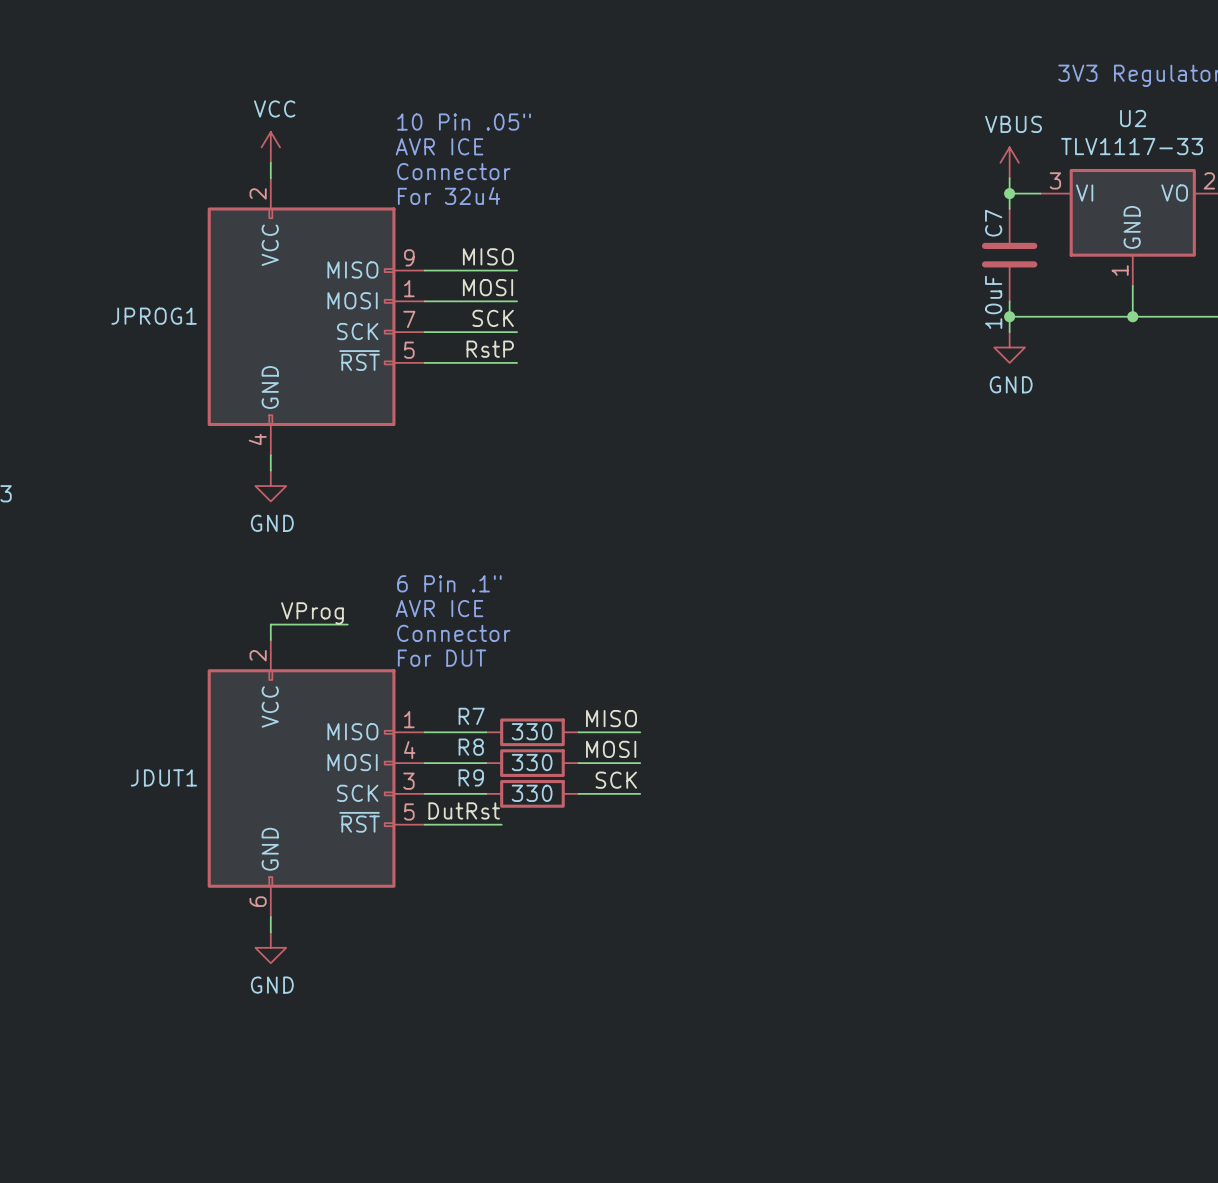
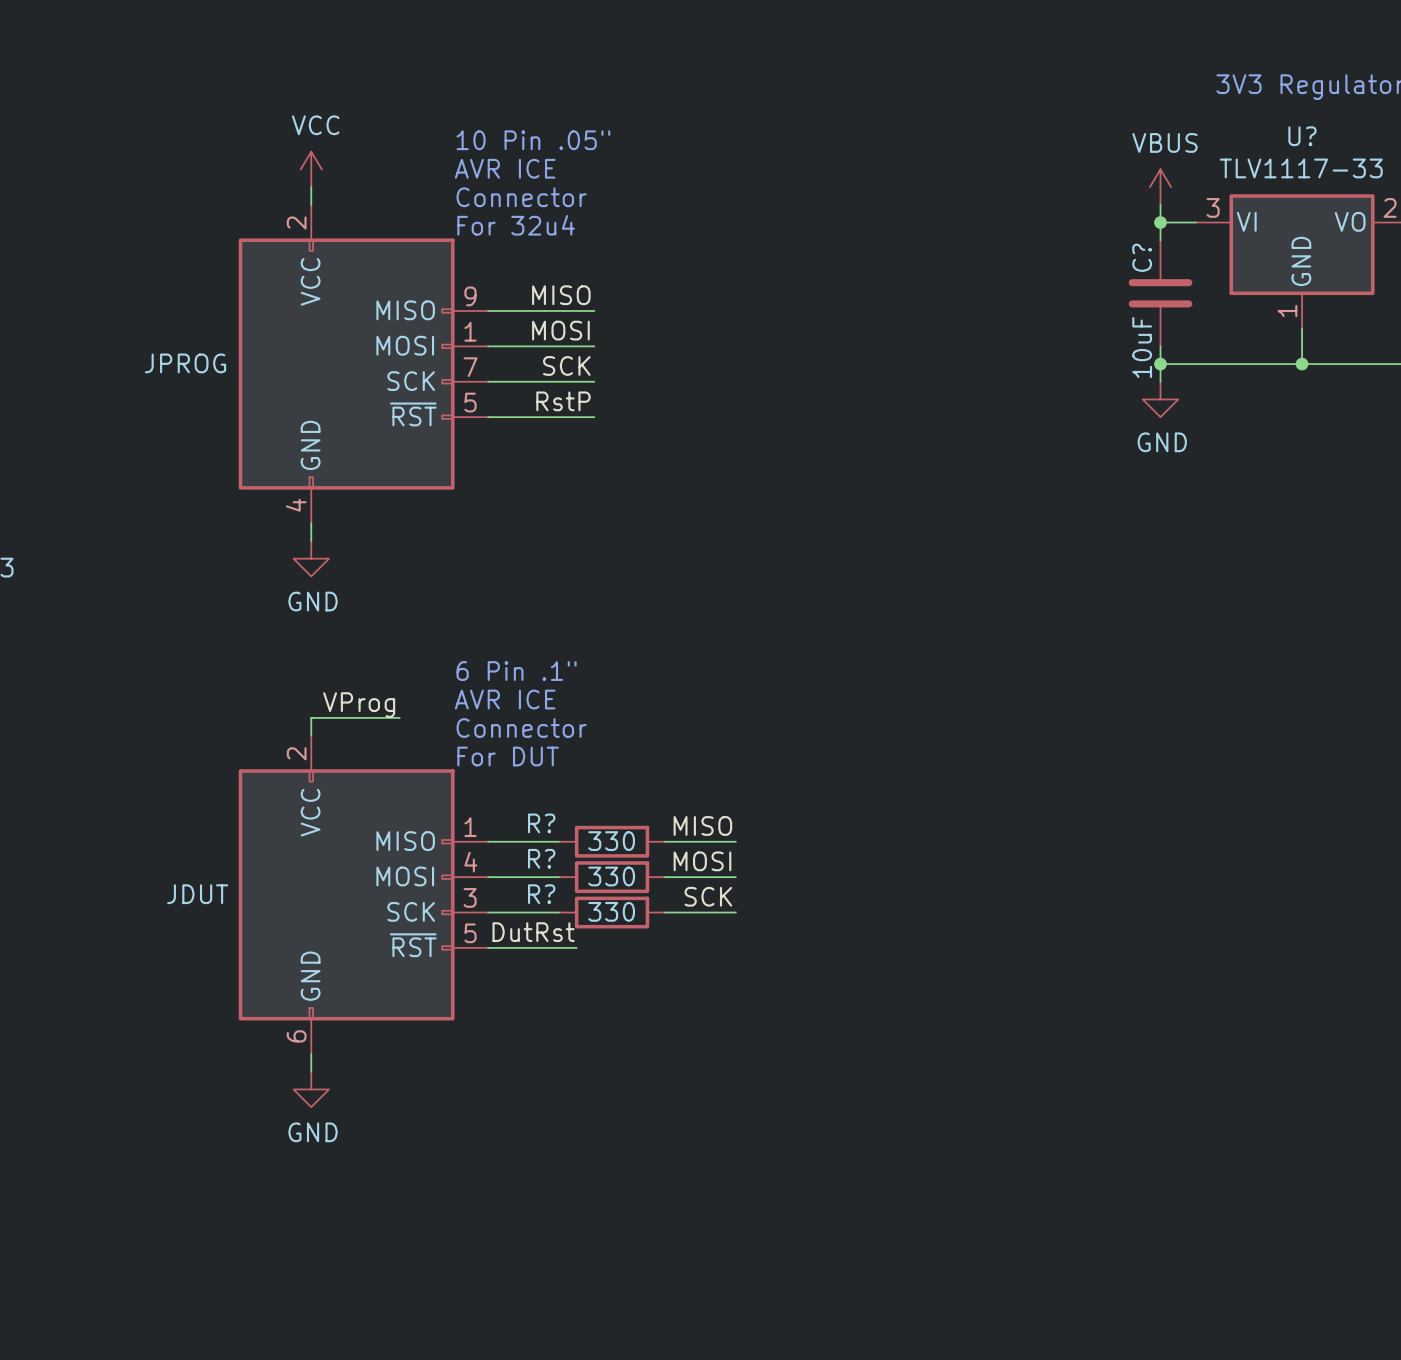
U2 name: U2 (1133, 118) -> U? (1302, 136)
C7 name: C7 (993, 223) -> C? (1142, 257)
JPROG1 name: JPROG1 (154, 316) -> JPROG (185, 363)
R7 name: R7 (471, 716) -> R? (541, 823)
R8 name: R8 (471, 747) -> R? (541, 858)
JDUT1 name: JDUT1 (163, 777) -> JDUT (197, 894)
R9 name: R9 (471, 777) -> R? (541, 894)

